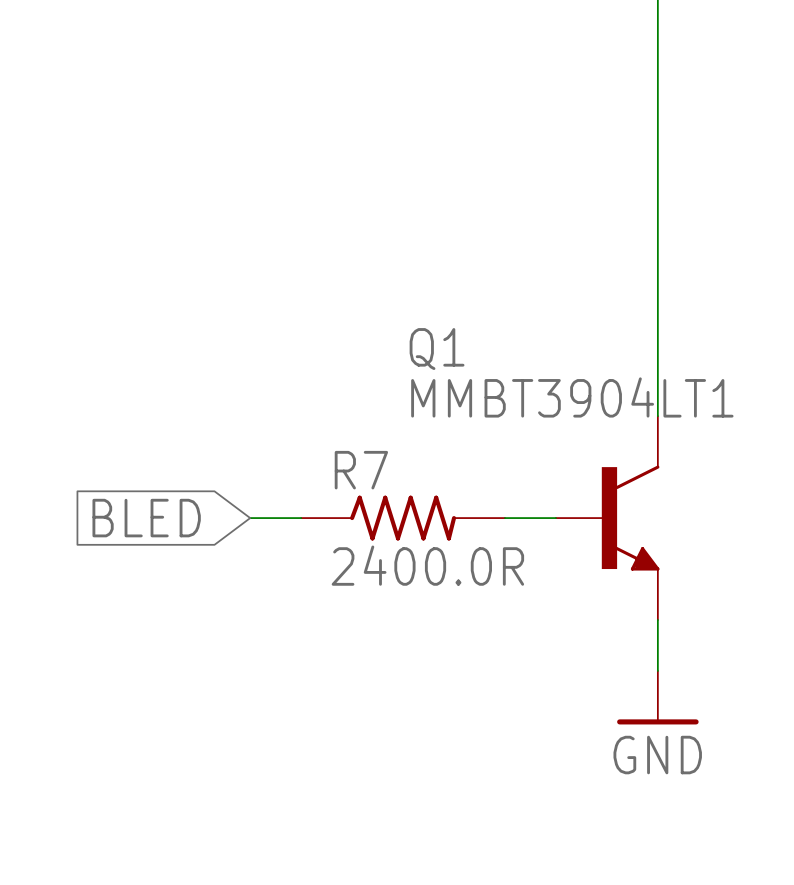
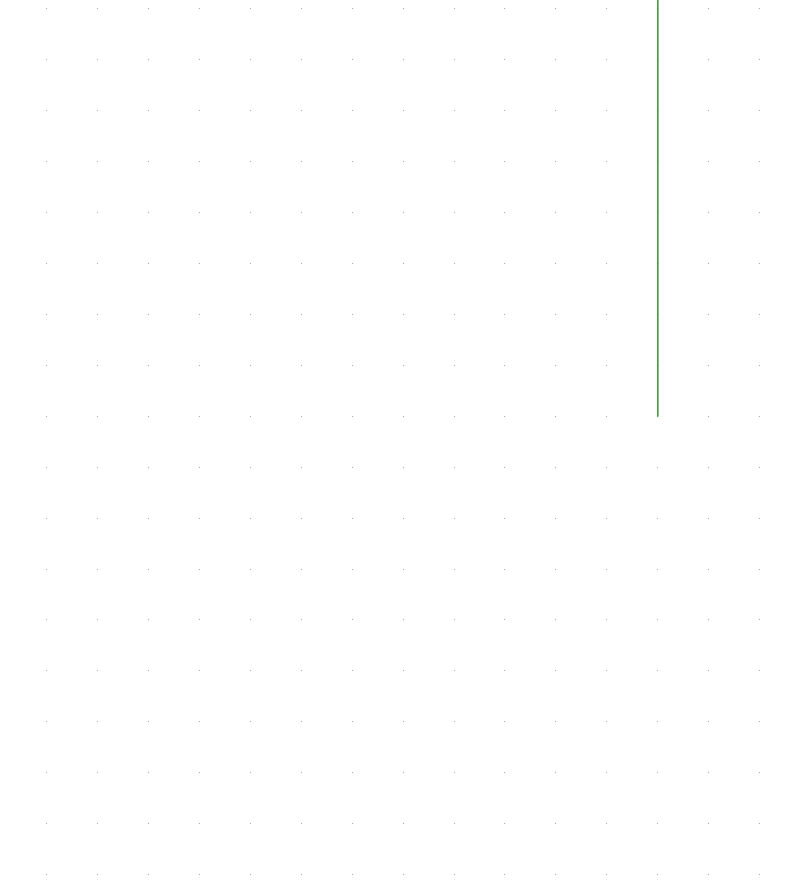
global label: BLED (146, 518) -> none
wire: (250, 518) (301, 518) -> none
R7: 2400.0R (403, 518) -> none
wire: (504, 518) (555, 518) -> none
Q1: MMBT3904LT1 (607, 518) -> none
wire: (657, 619) (657, 670) -> none
power symbol: GND (657, 697) -> none

